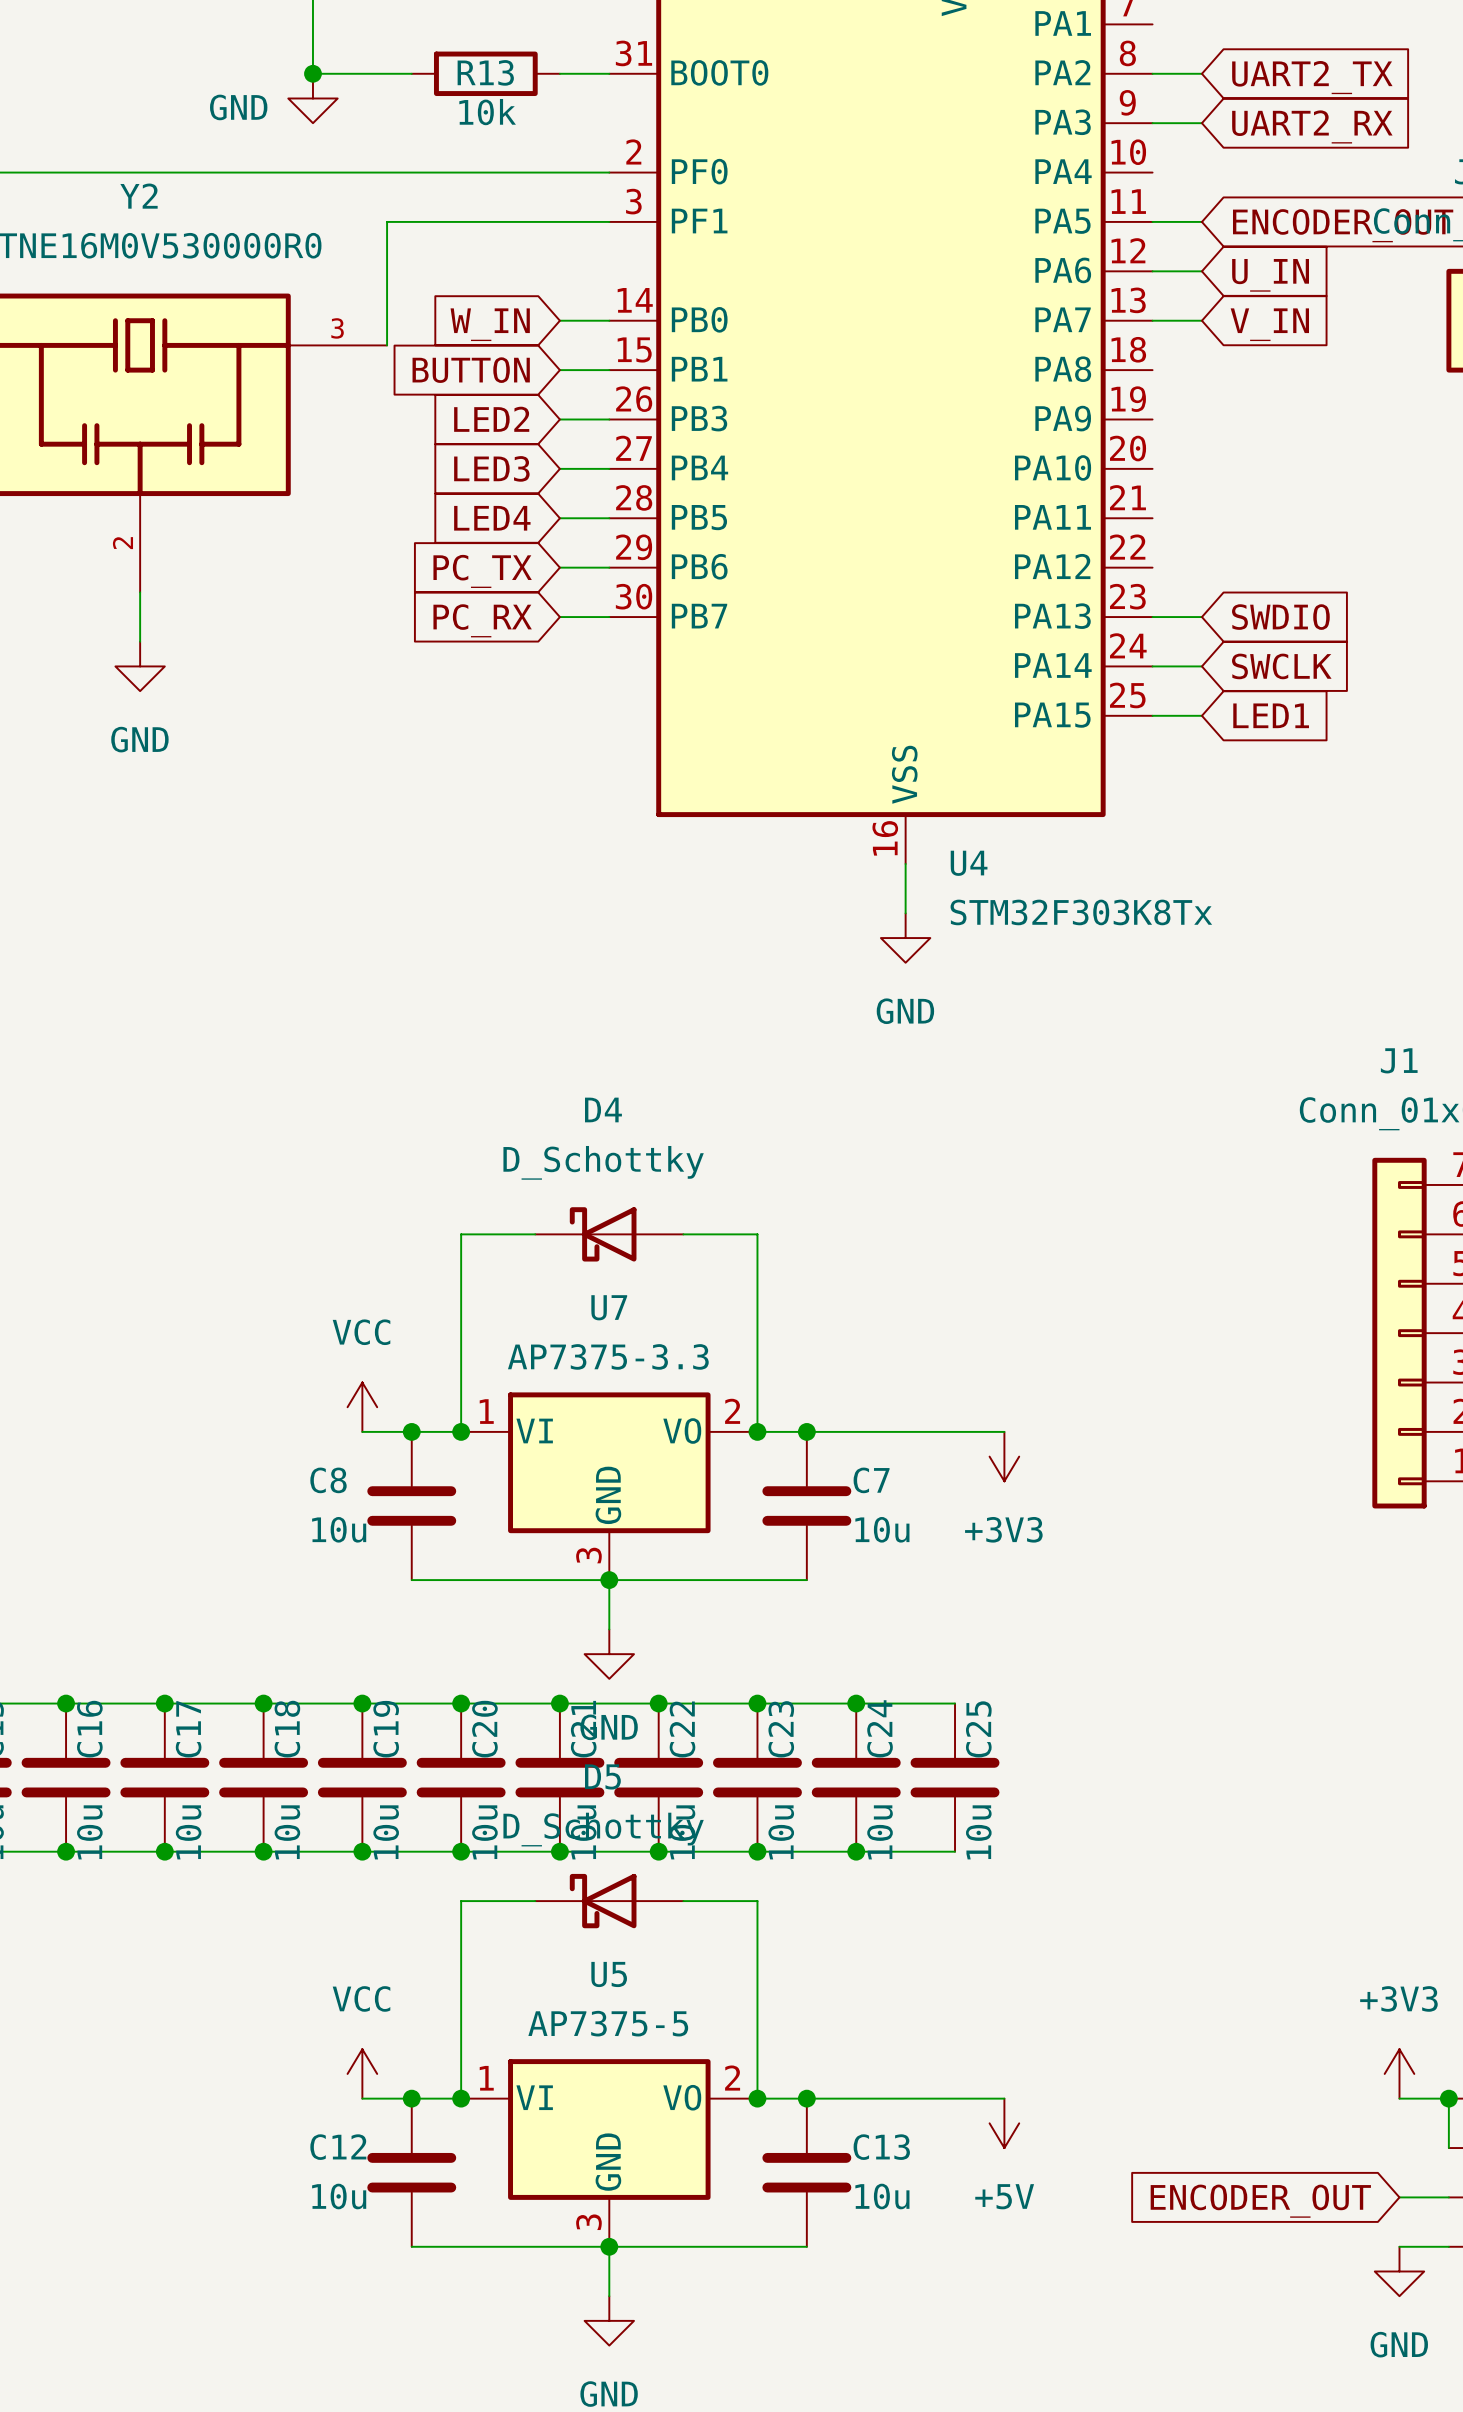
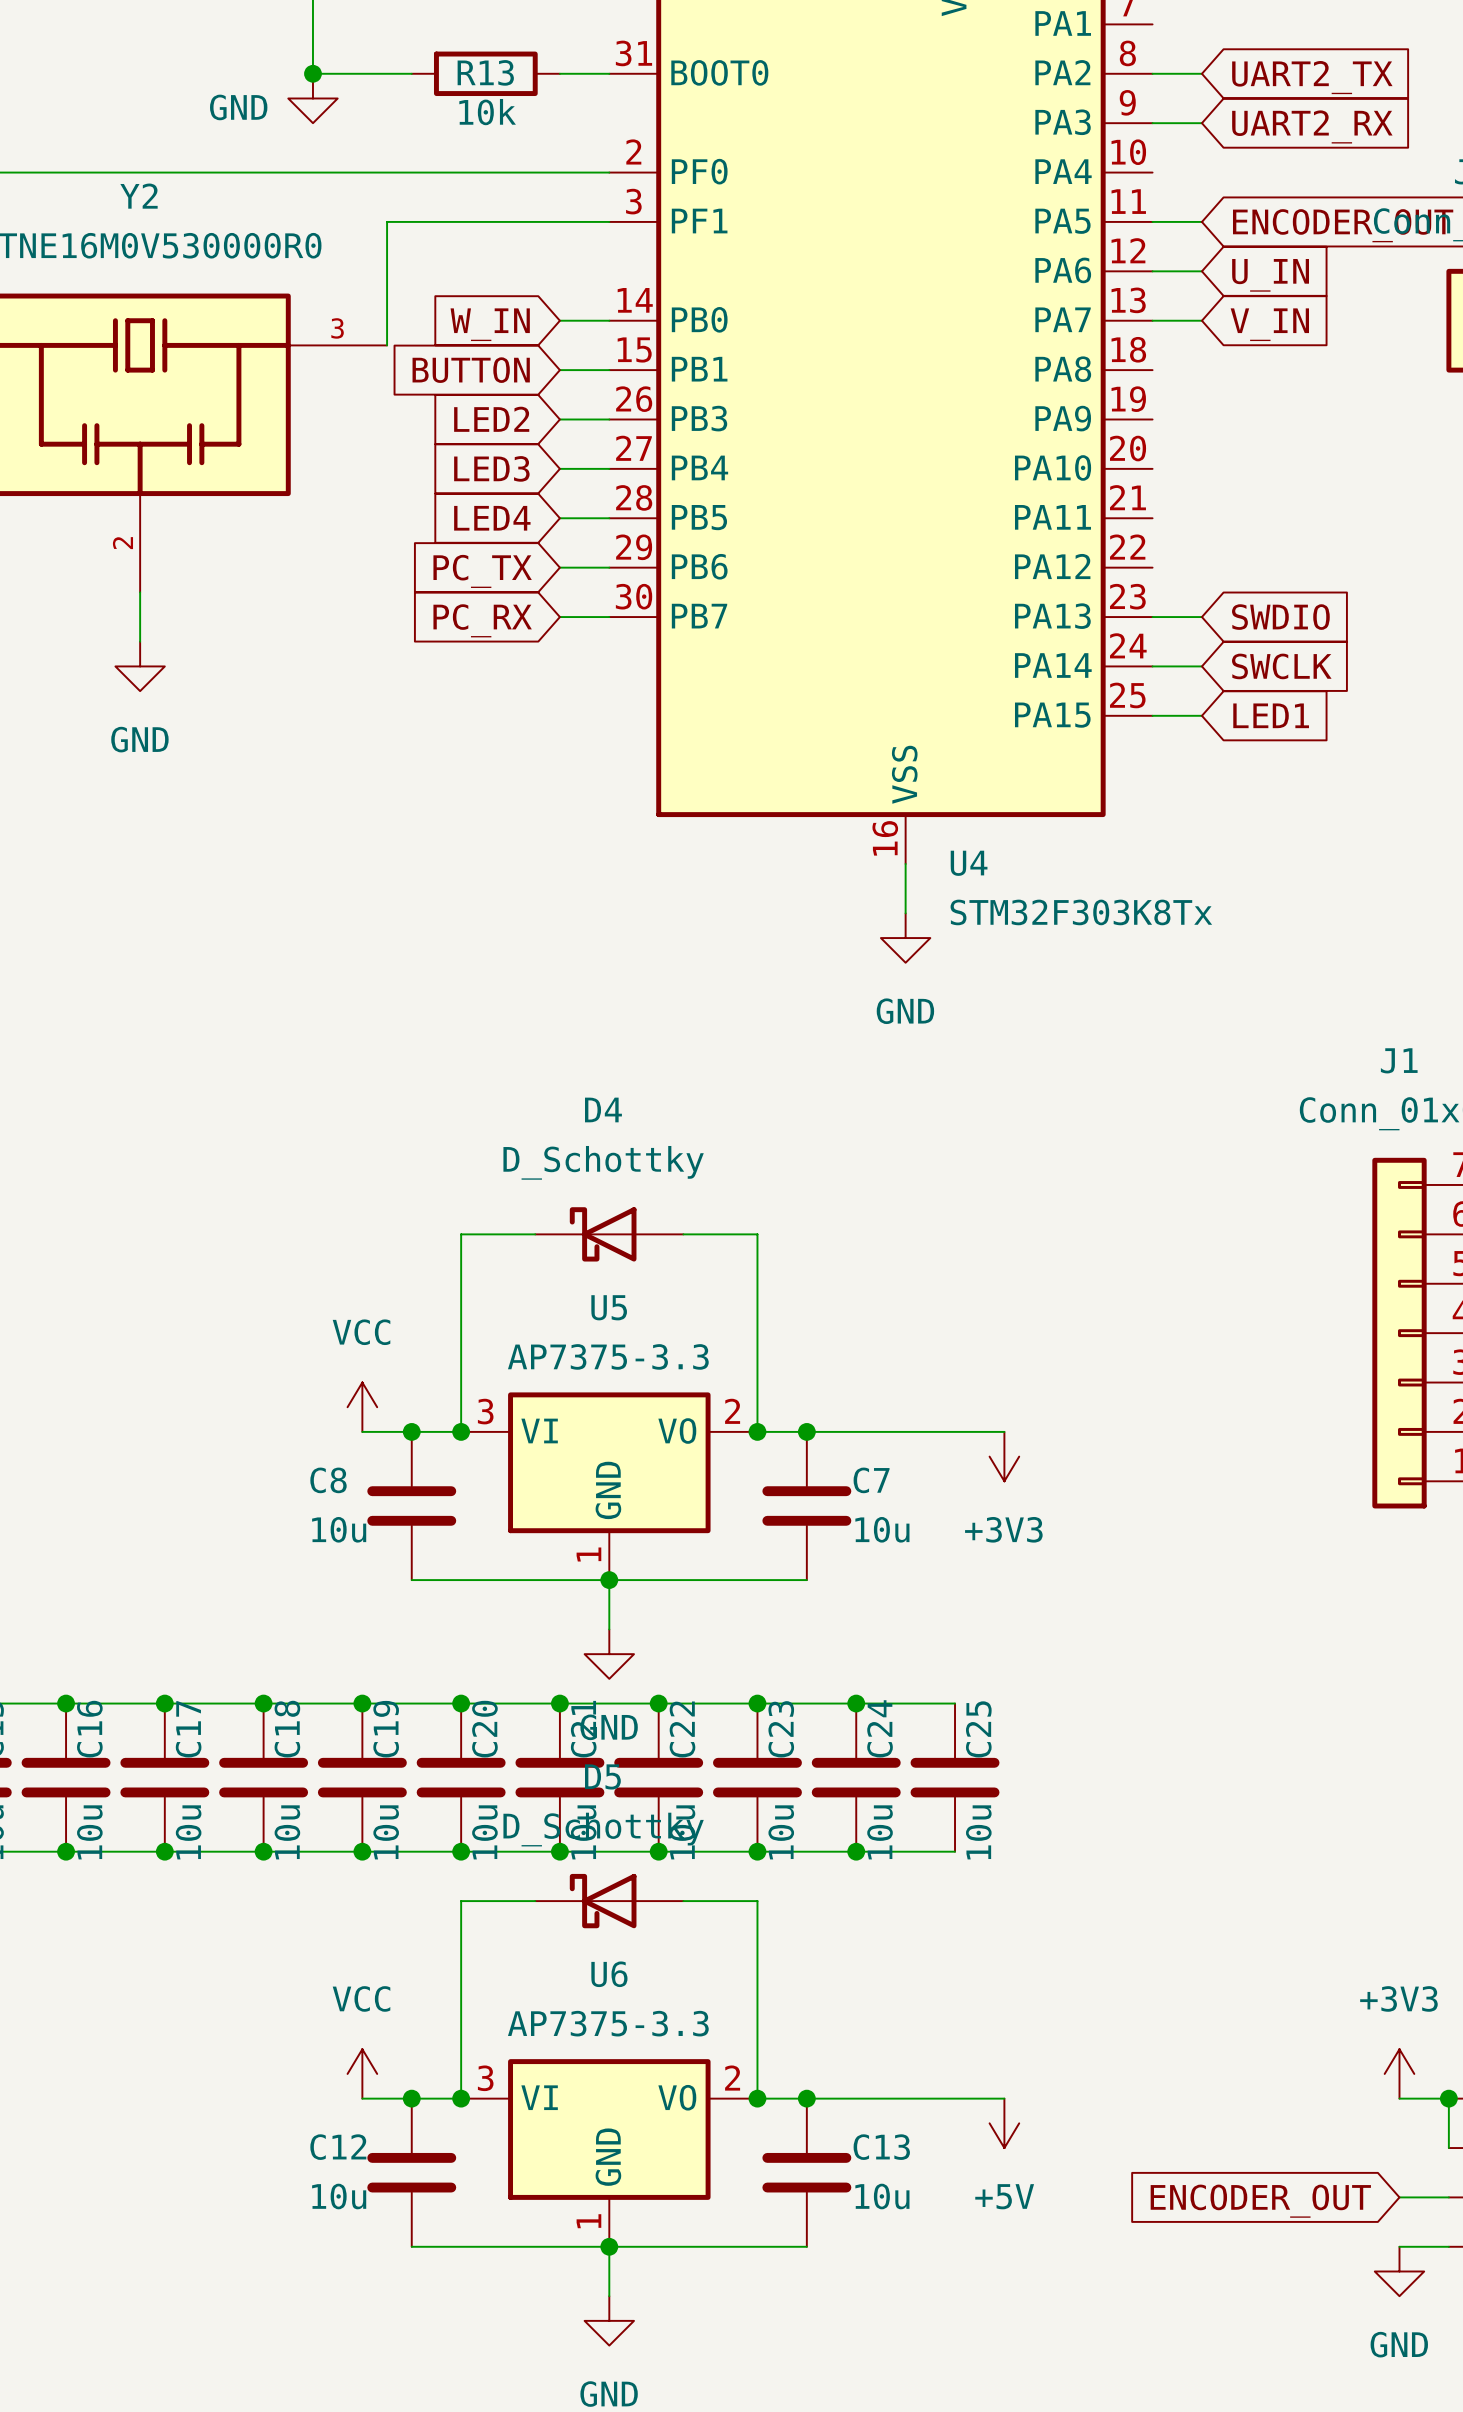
U7: AP7375-3.3 (609, 1486) -> none
U5 value: AP7375-5 (608, 2023) -> AP7375-3.3 (608, 1356)
U5 pin number: 1 (486, 2078) -> 3 (485, 1411)
U5 position: (609, 2152) -> (609, 1486)
U6: none -> AP7375-3.3 (609, 2152)
U5 pin number: 3 (588, 2222) -> 1 (588, 1554)

